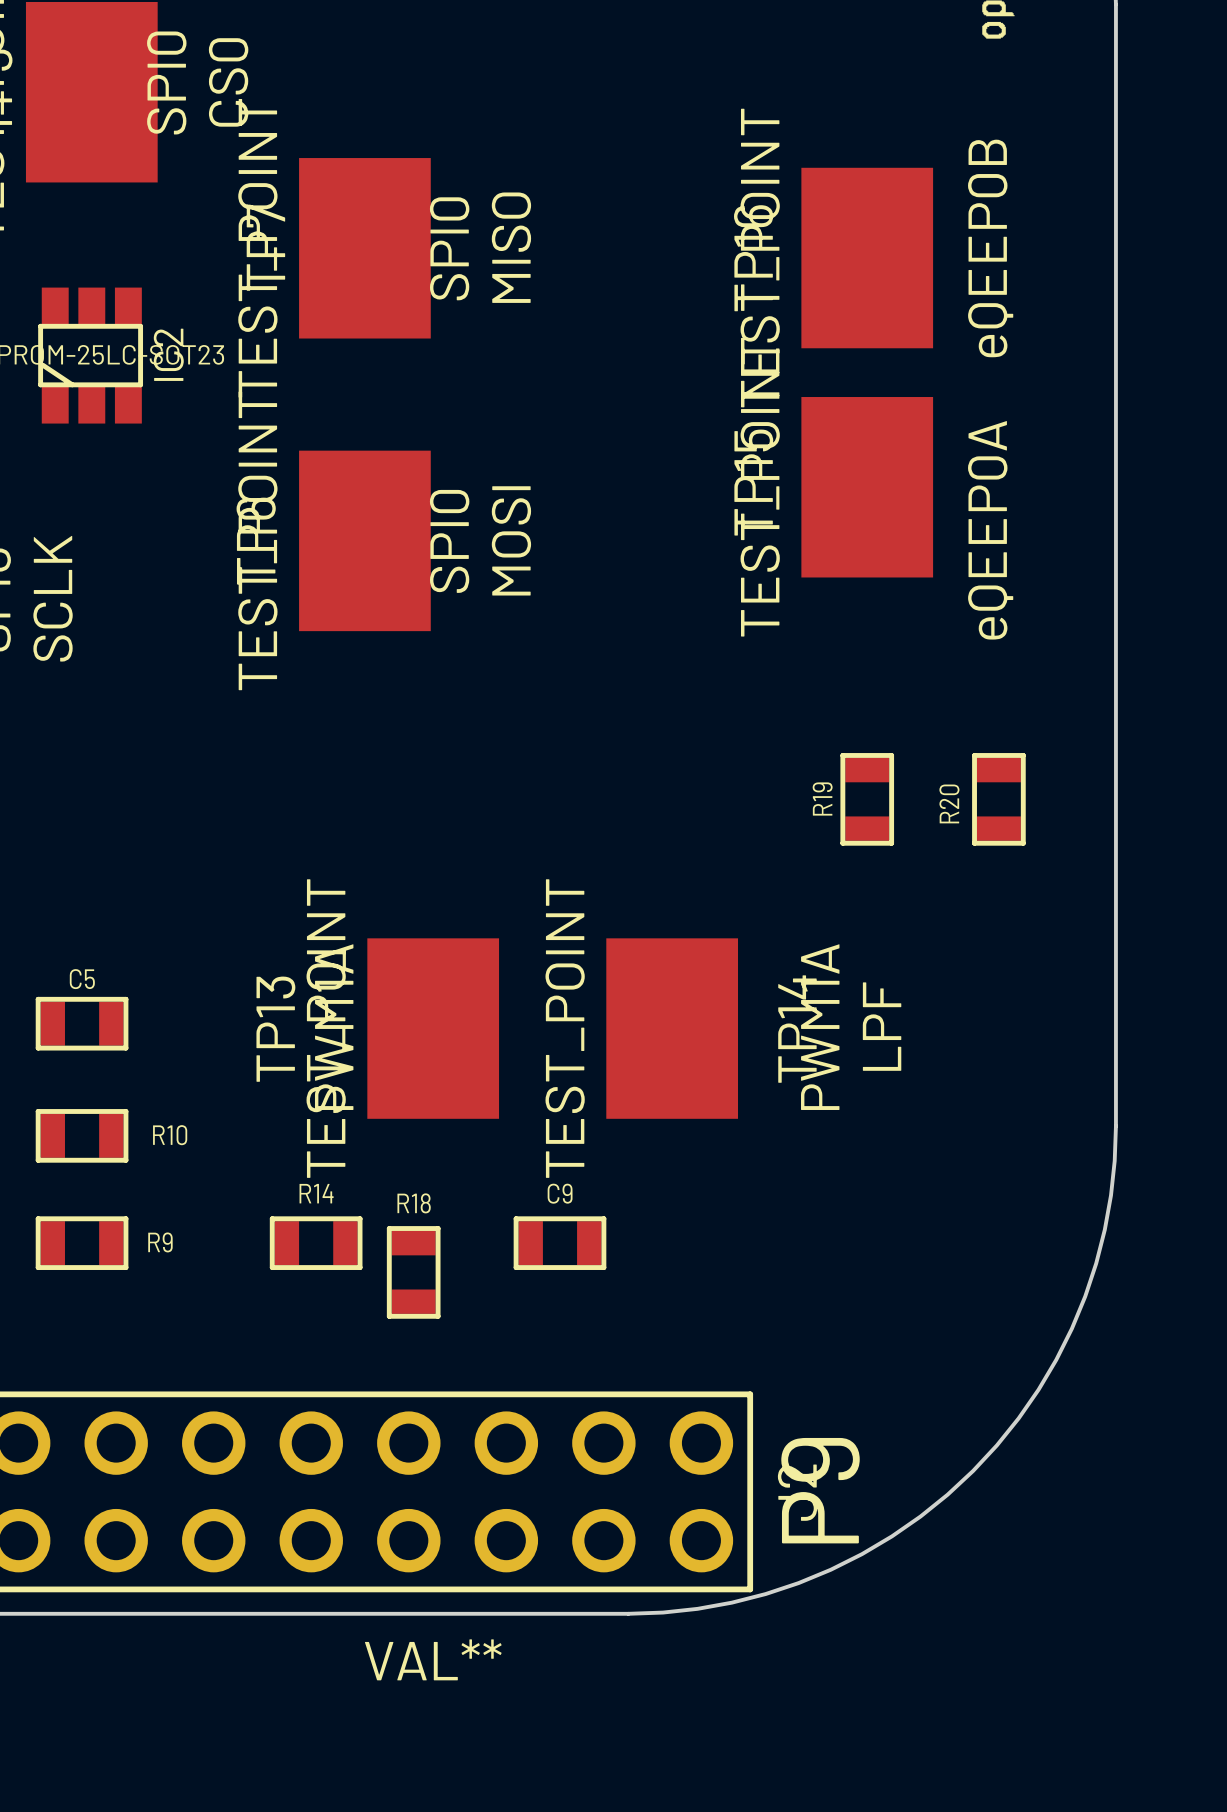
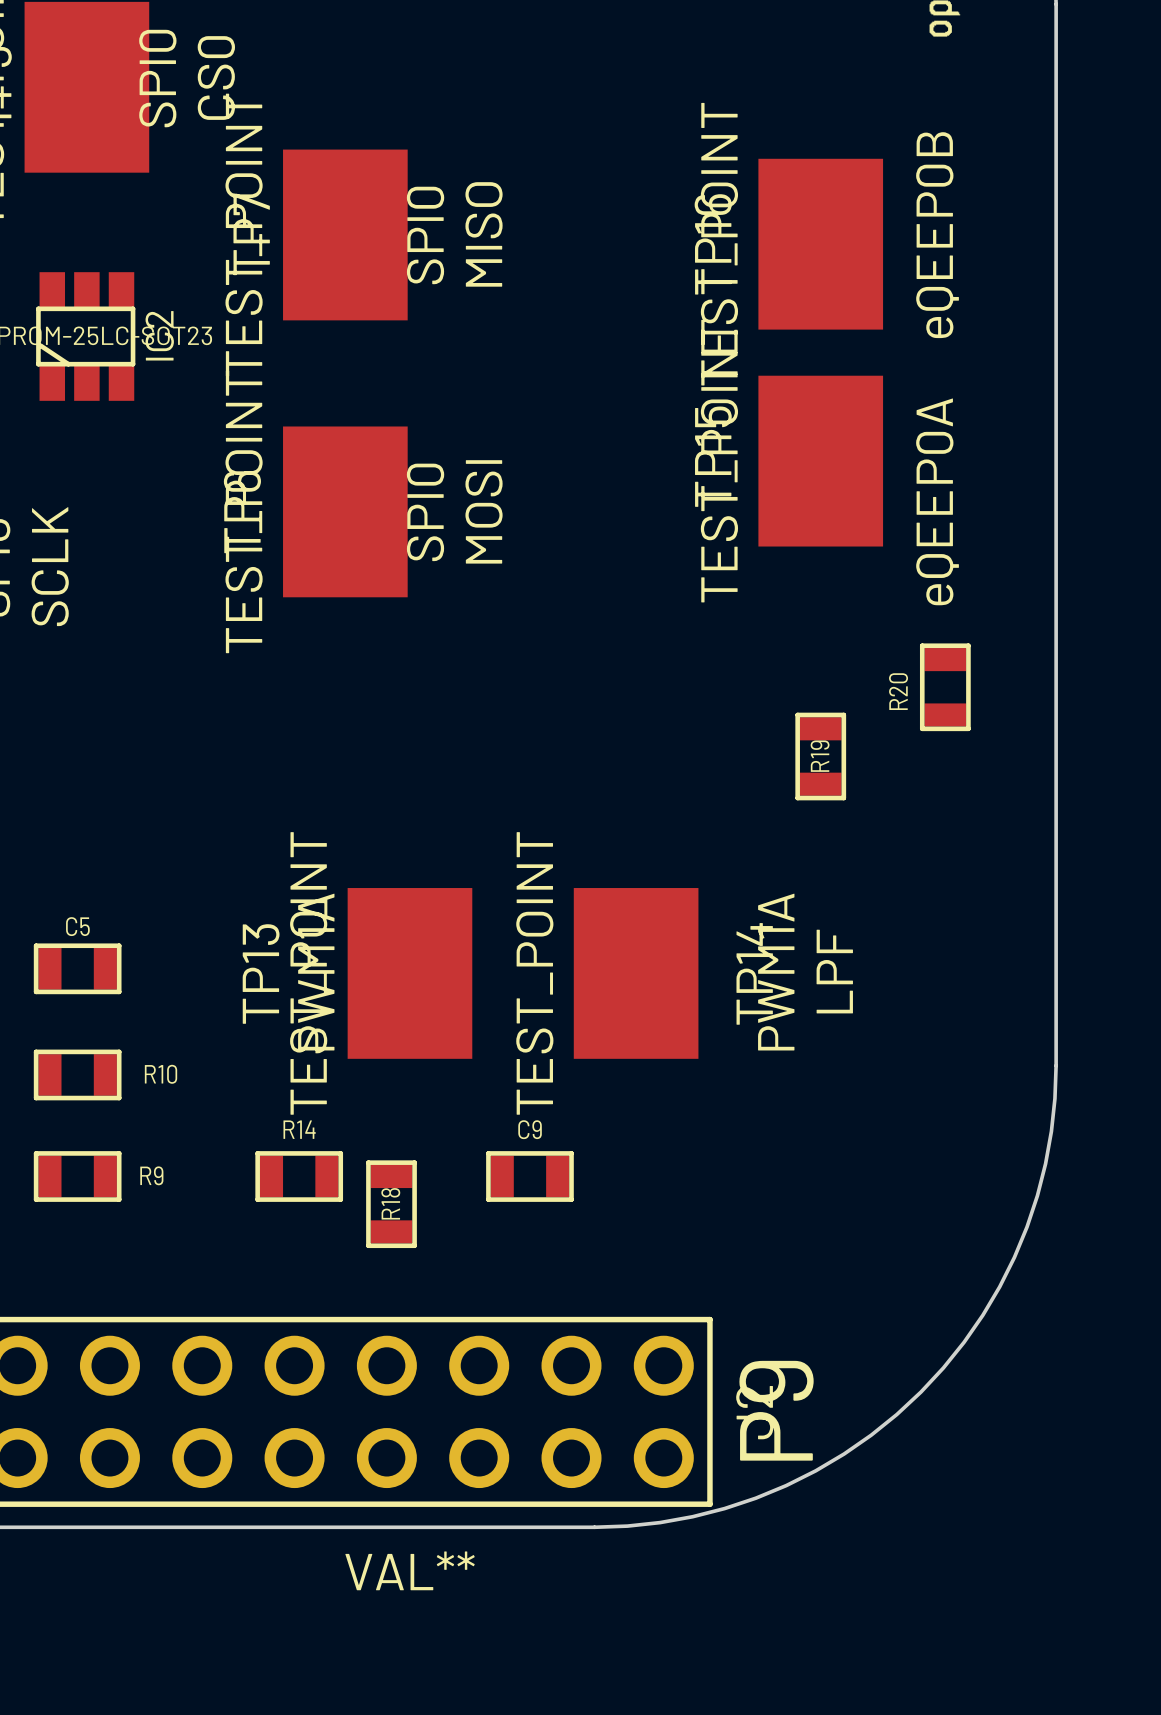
R19 name position: R19 (822, 799) -> R19 (820, 756)
R20 position: (998, 799) -> (945, 687)
R18 name rotation: 0° (414, 1203) -> 90° counterclockwise (390, 1203)
R18 name position: R18 (414, 1203) -> R18 (390, 1203)

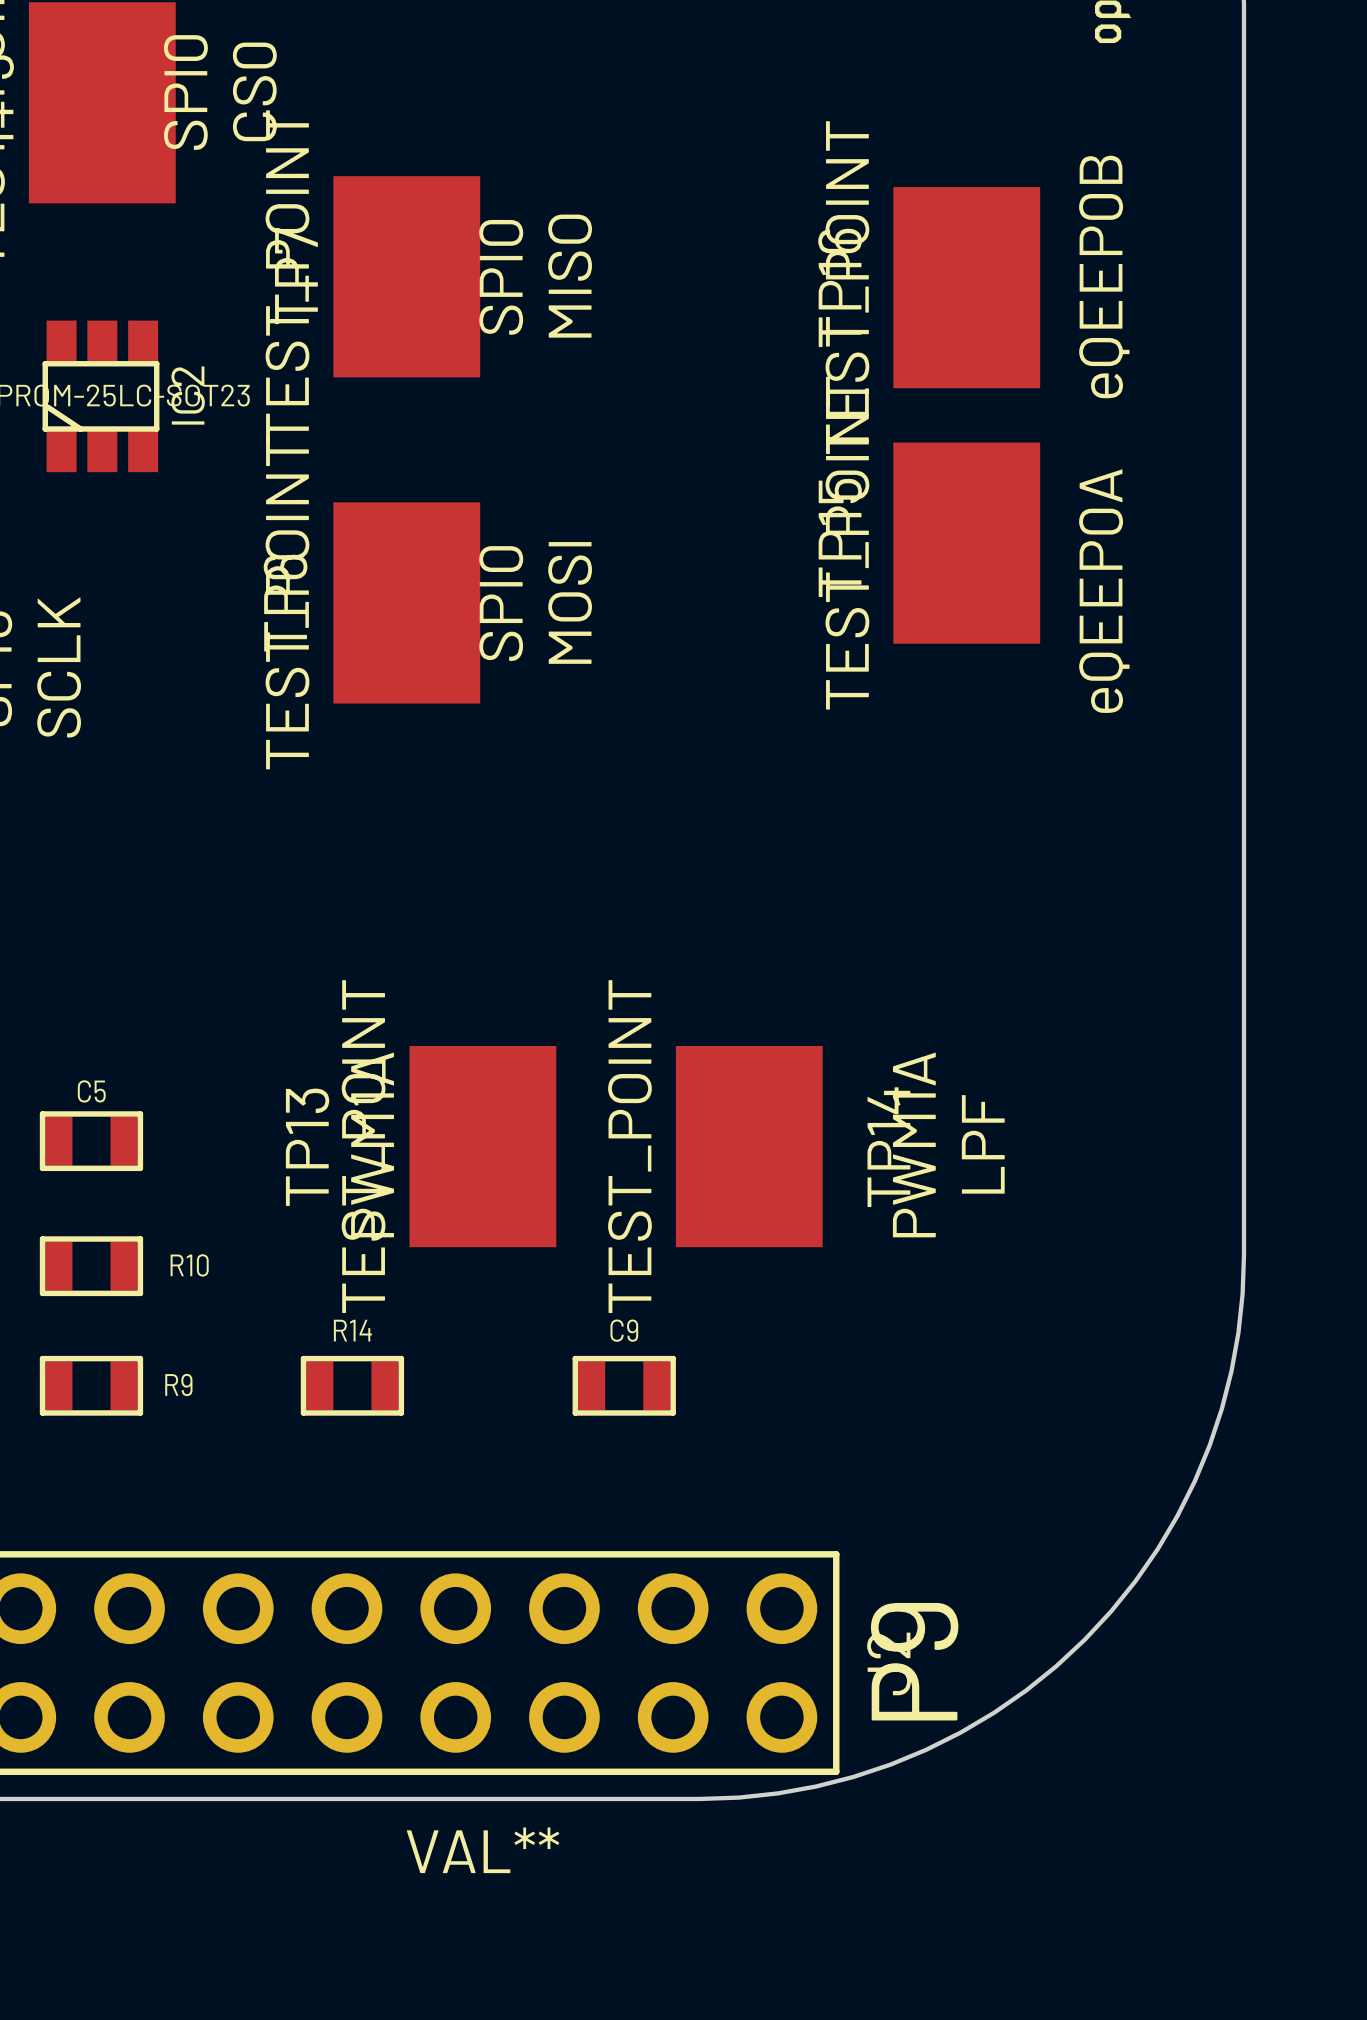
R20: (945, 687) -> none
R19: (820, 756) -> none
R18: (391, 1204) -> none

